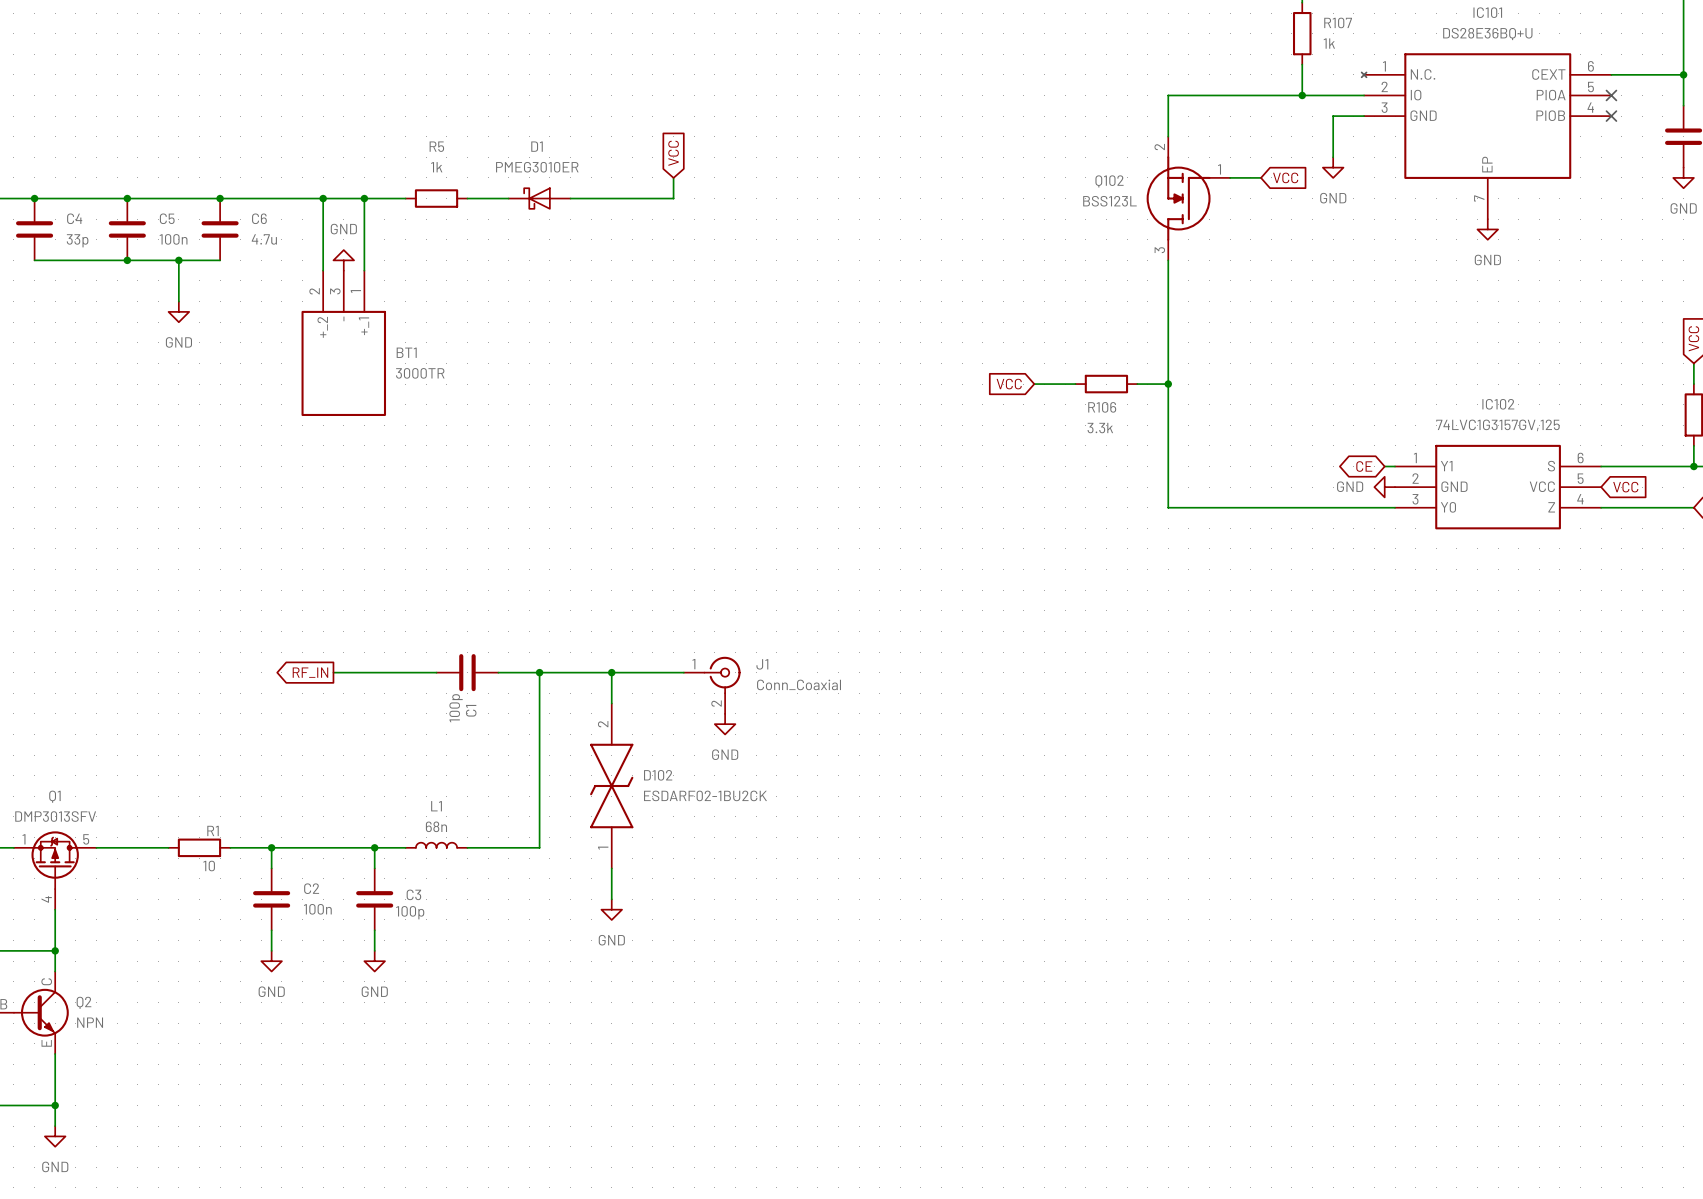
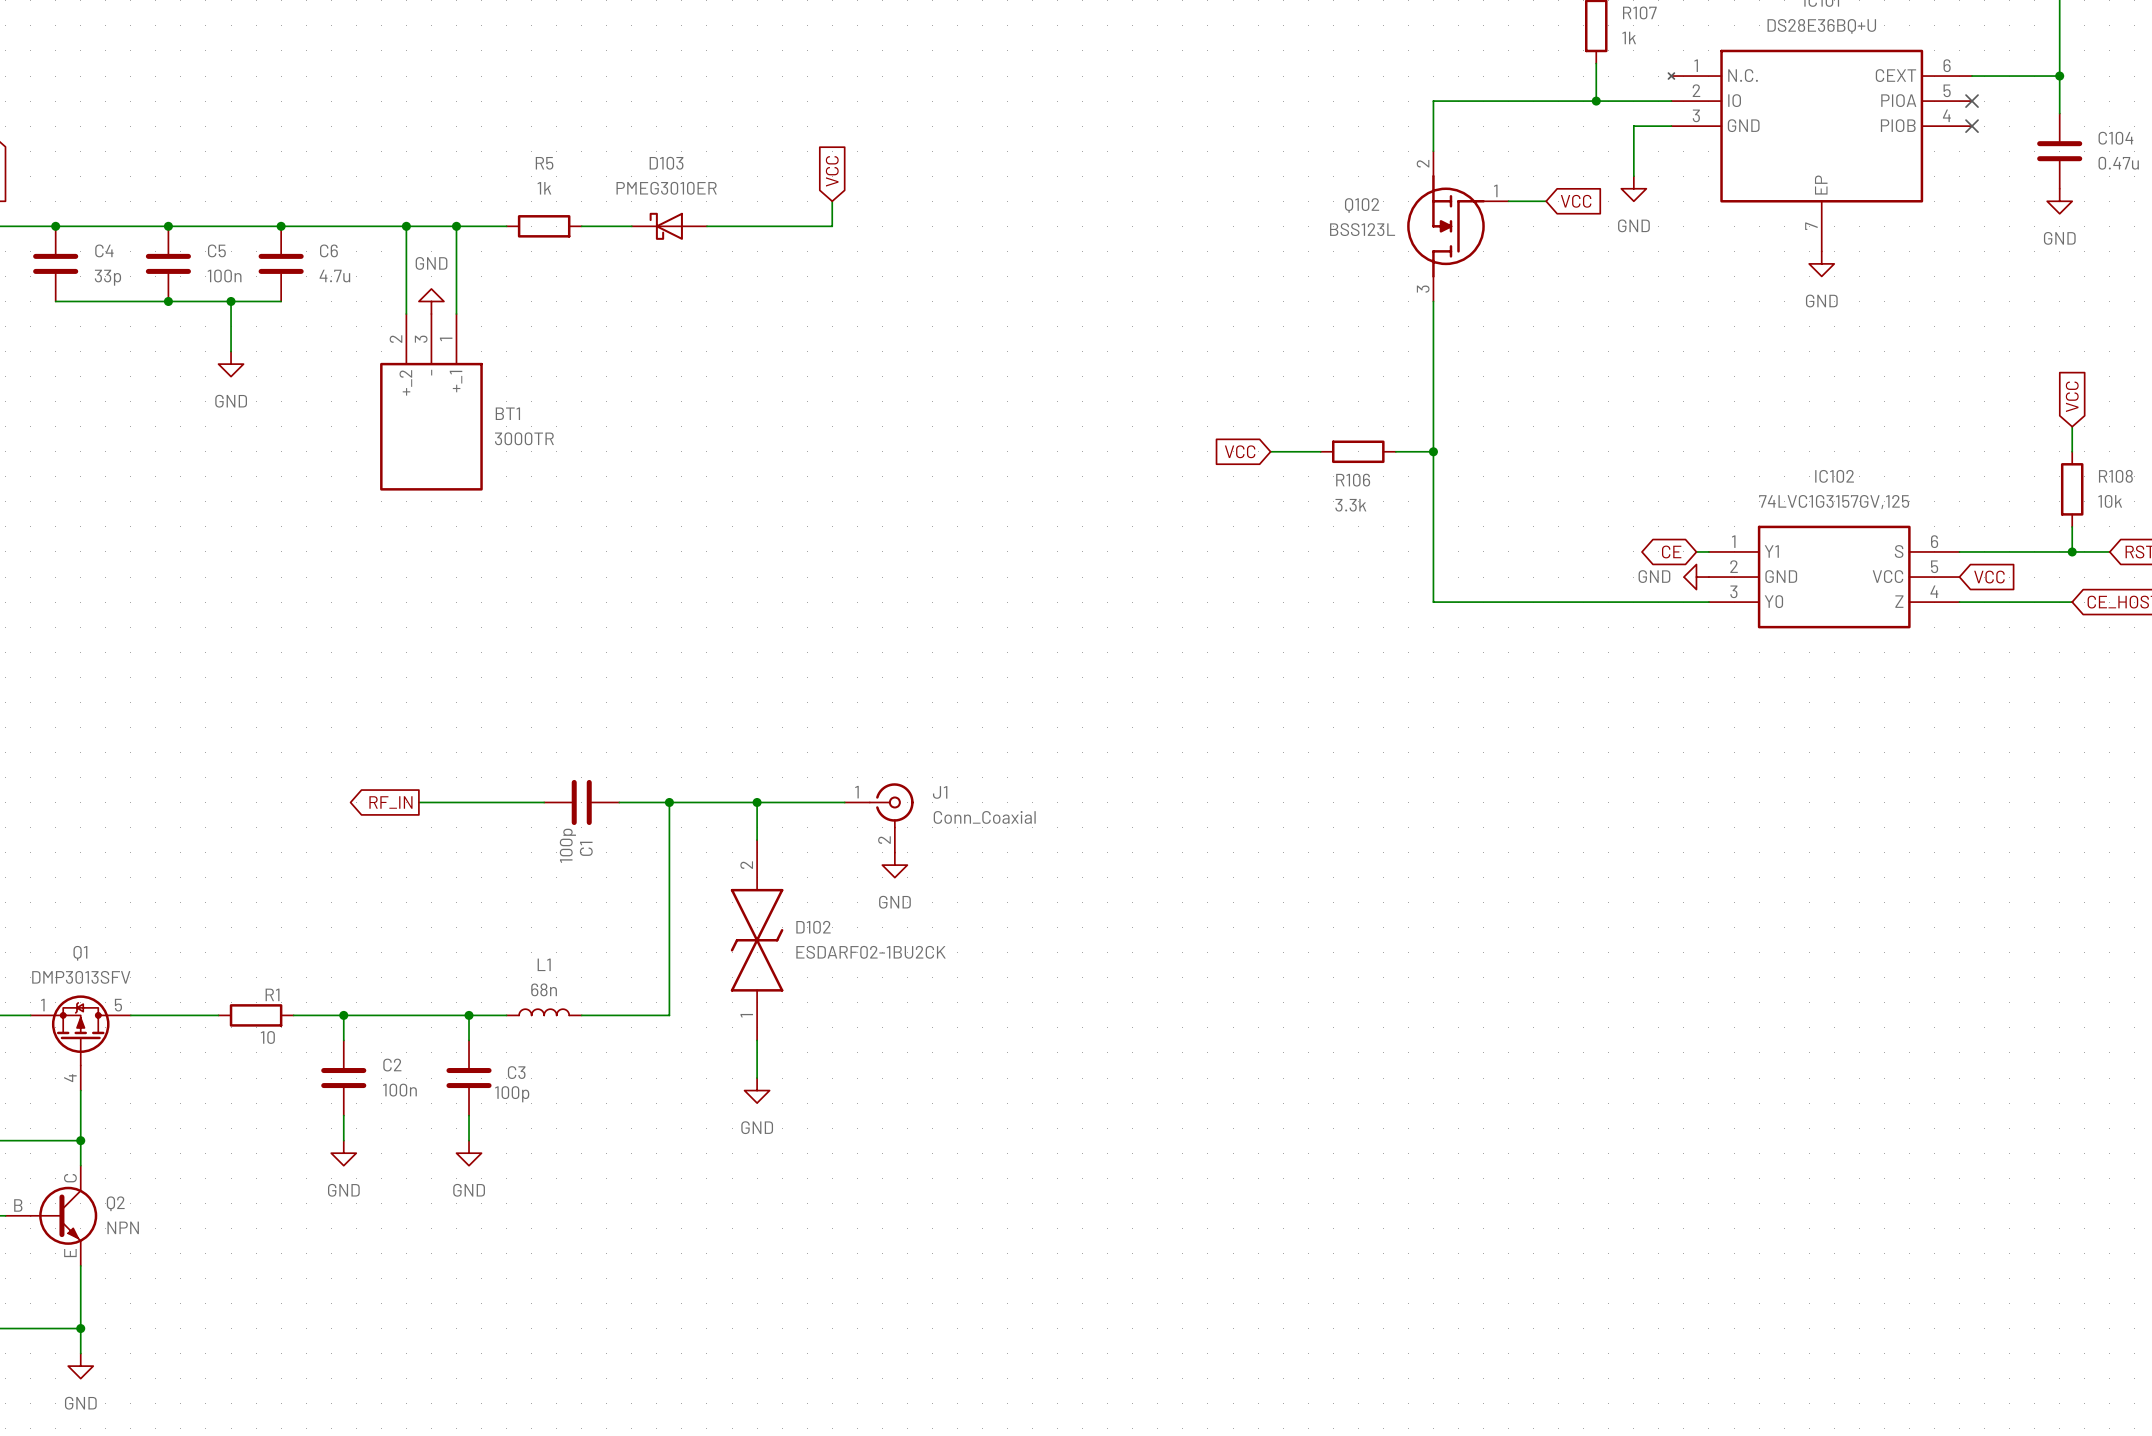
D1 name: D1 (537, 146) -> D103 (666, 163)

